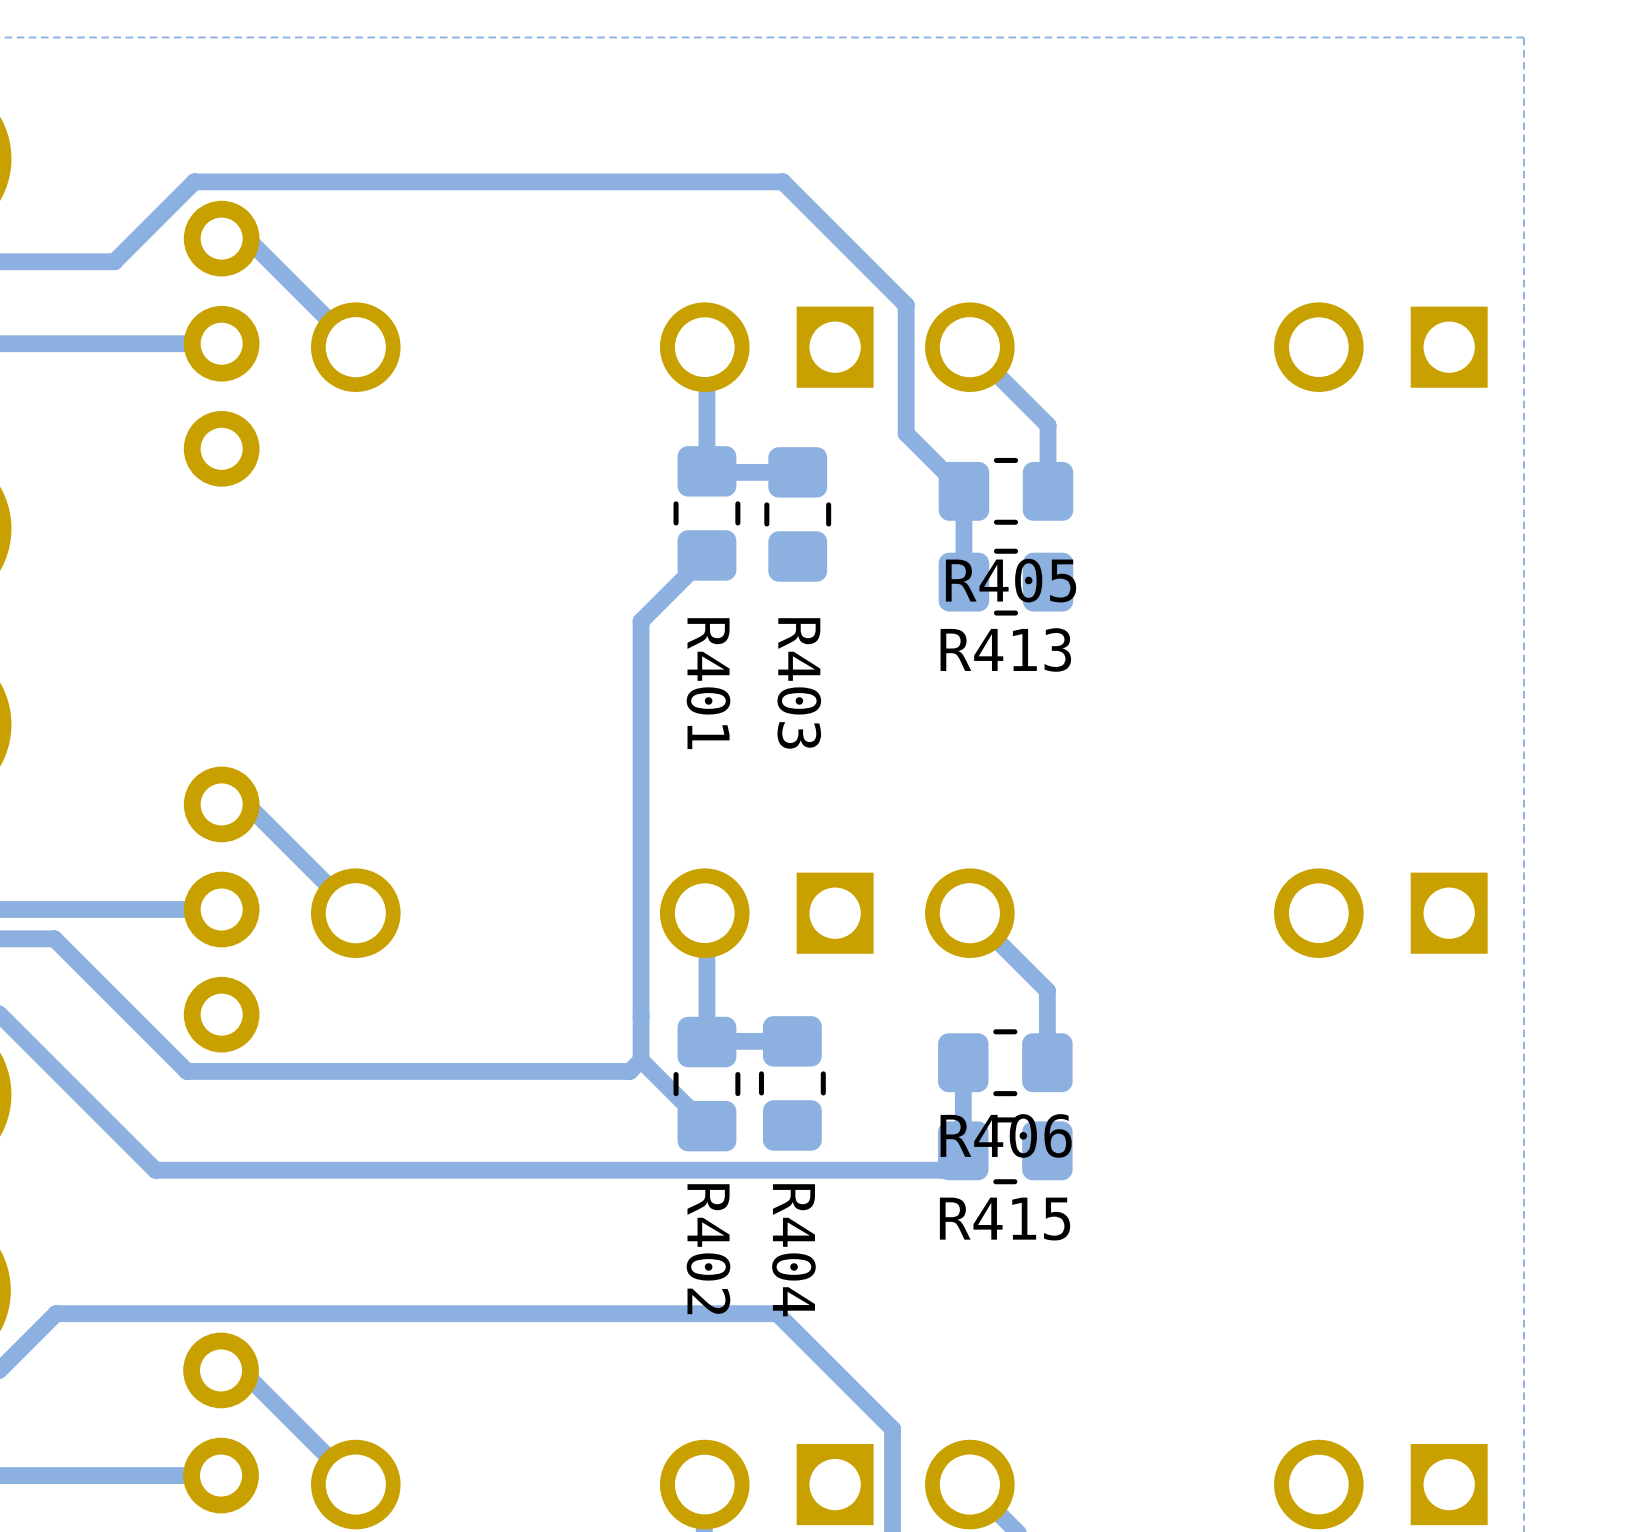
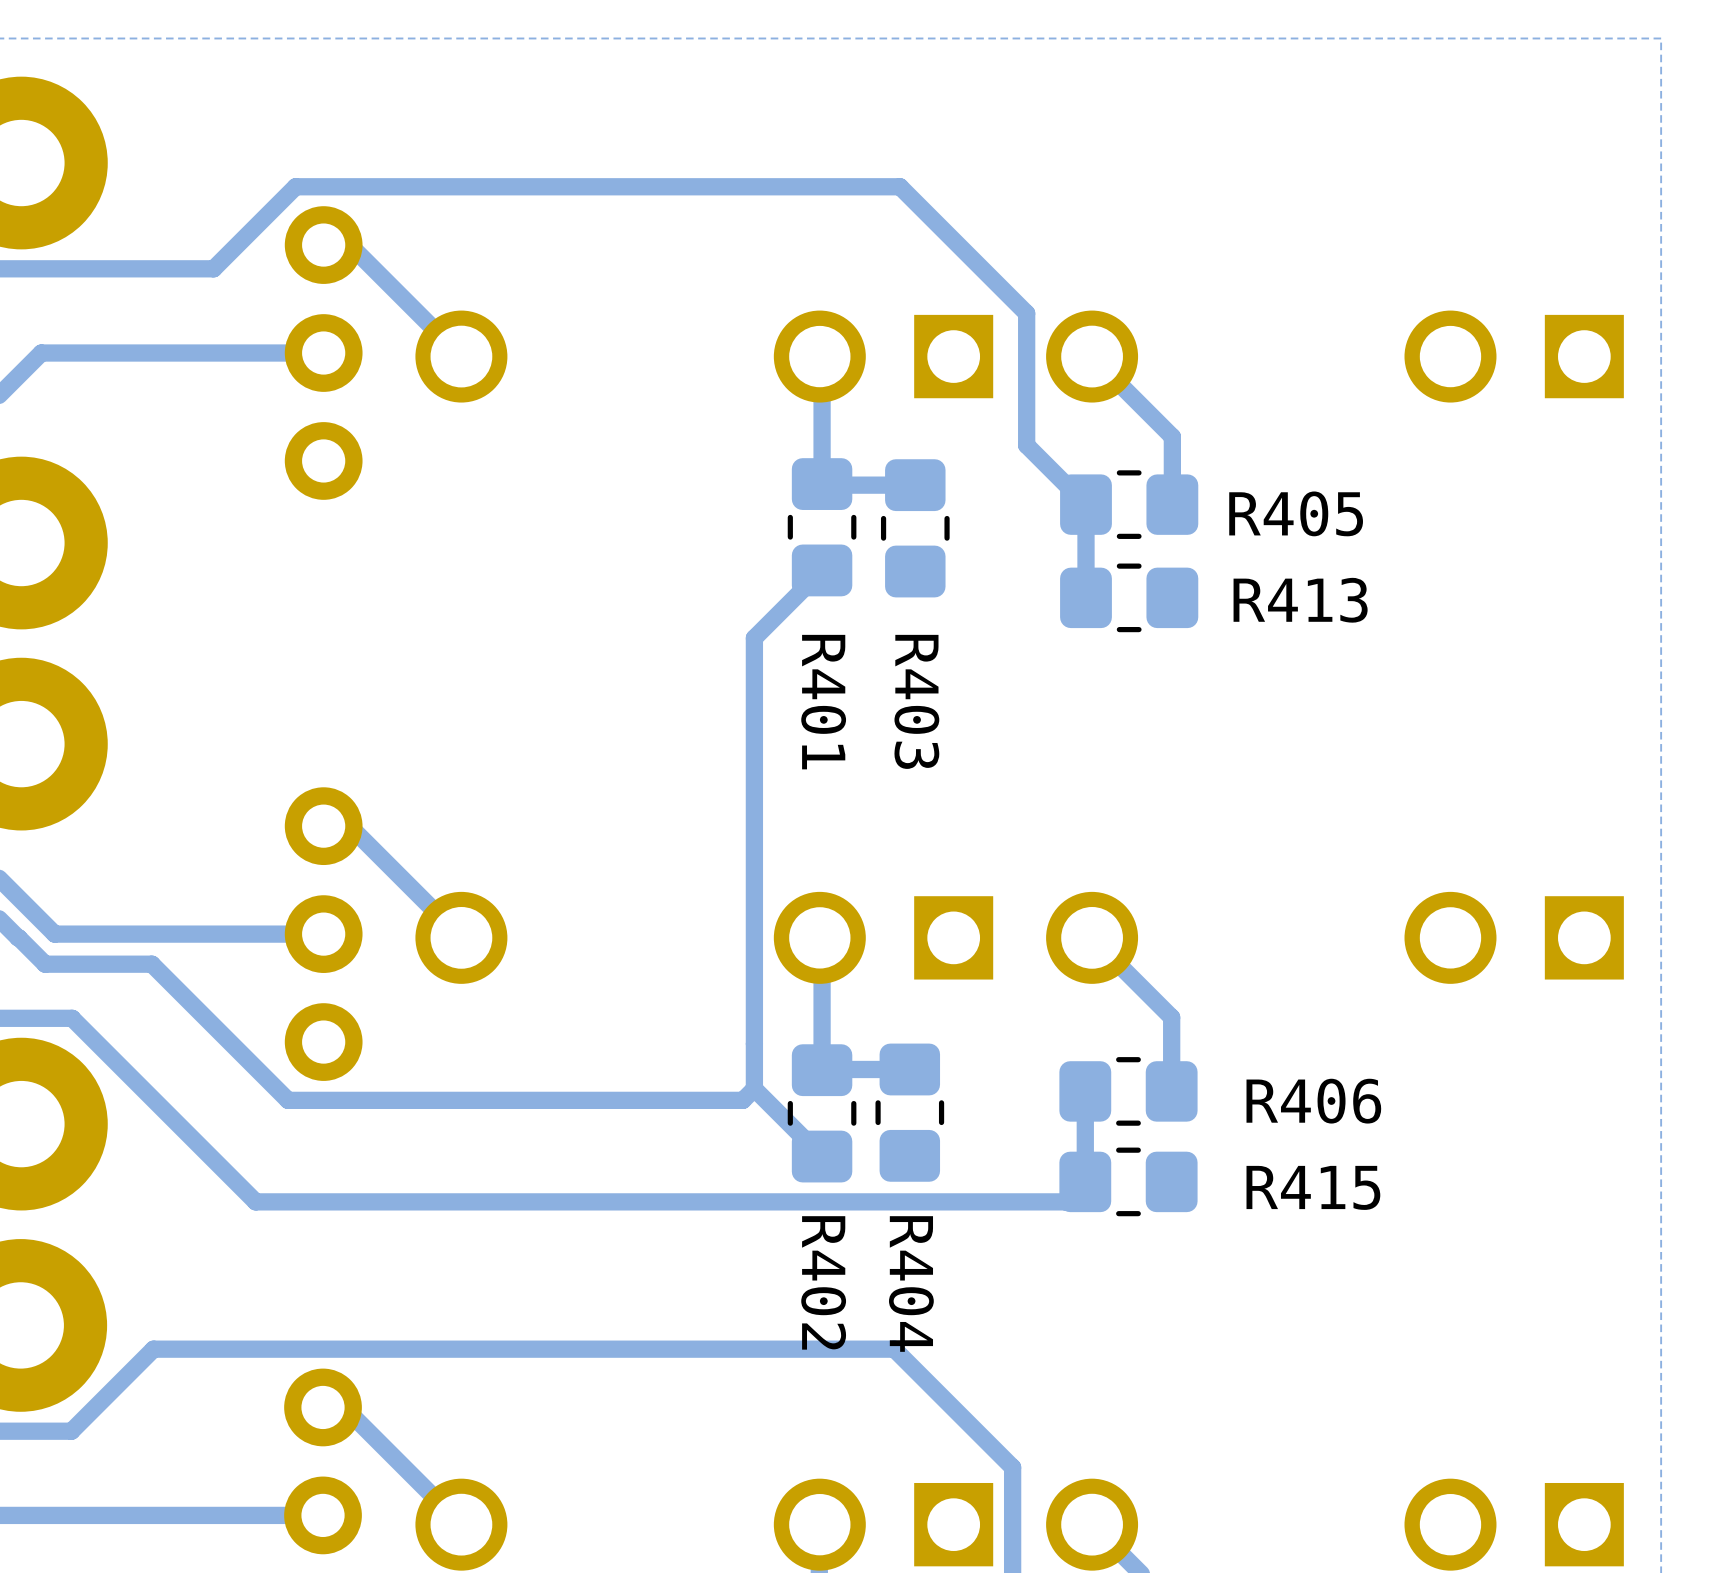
R405 name position: R405 (1011, 580) -> R405 (1296, 513)
R413 name position: R413 (1005, 649) -> R413 (1300, 600)
R406 name position: R406 (1006, 1135) -> R406 (1313, 1101)
R415 name position: R415 (1005, 1219) -> R415 (1313, 1187)

